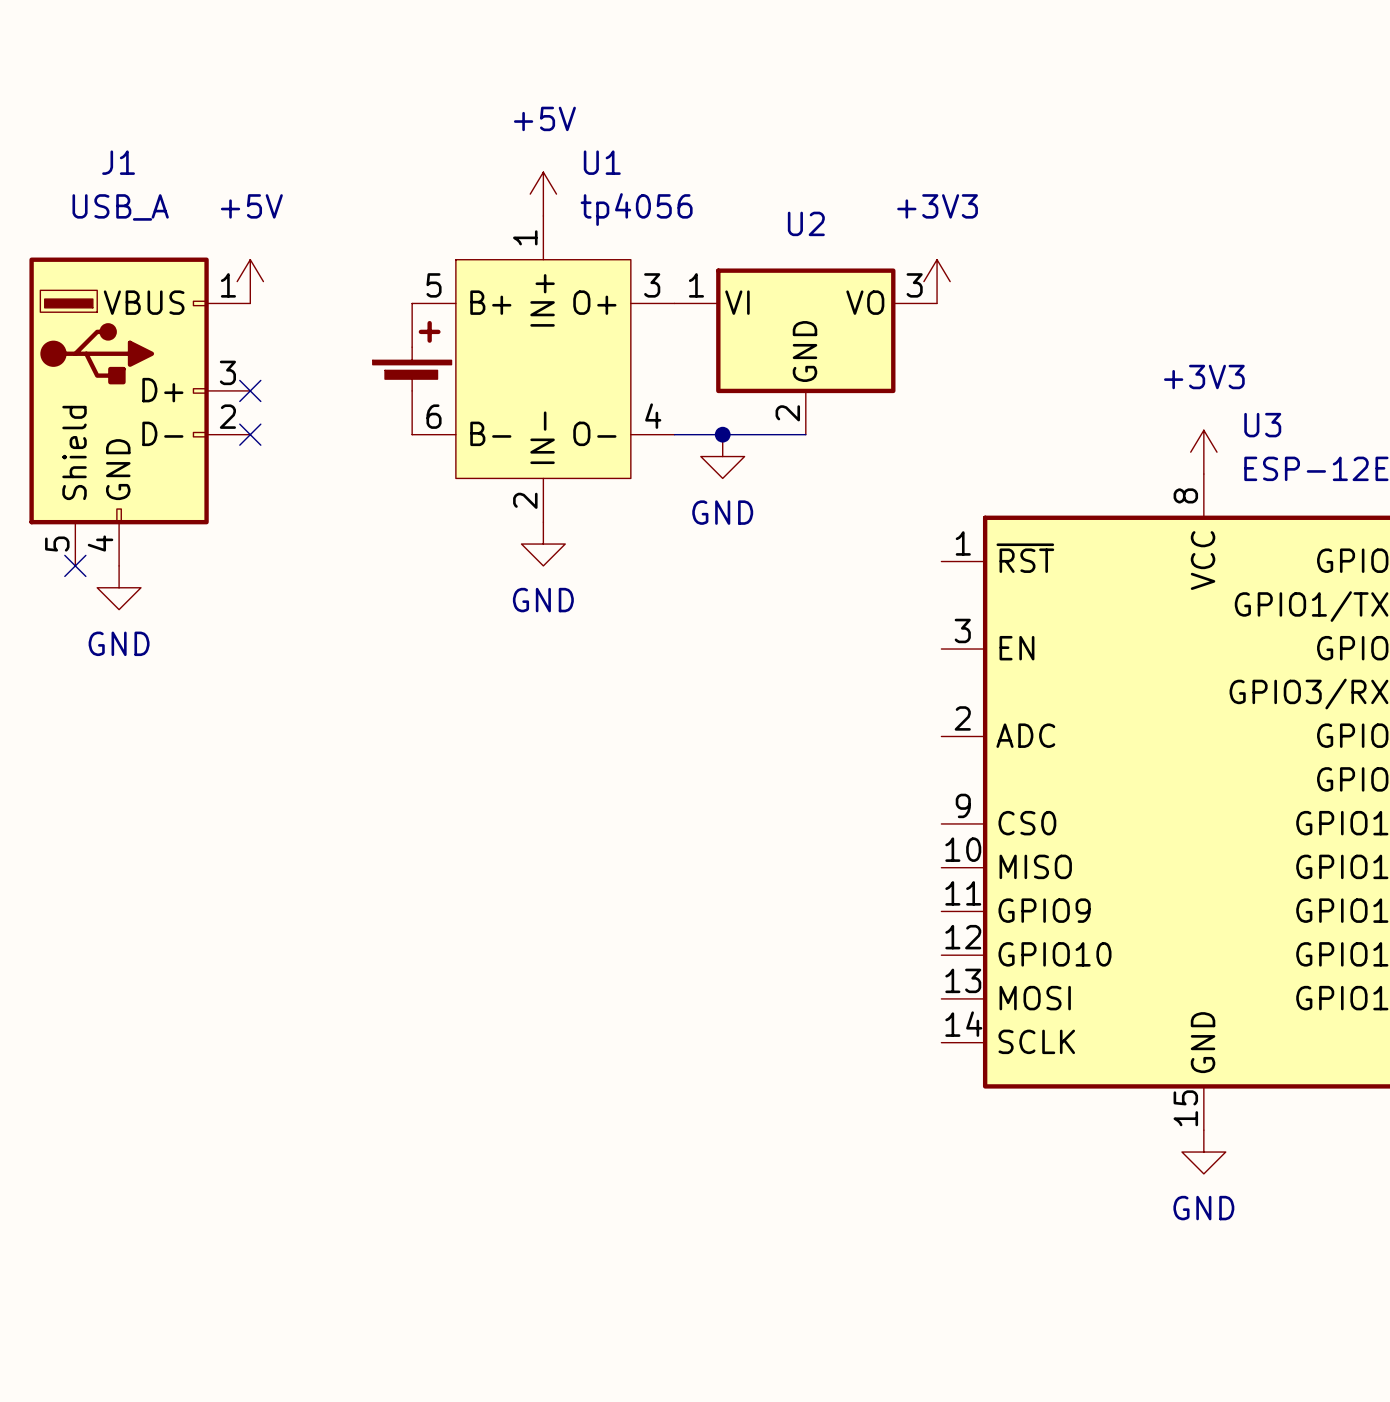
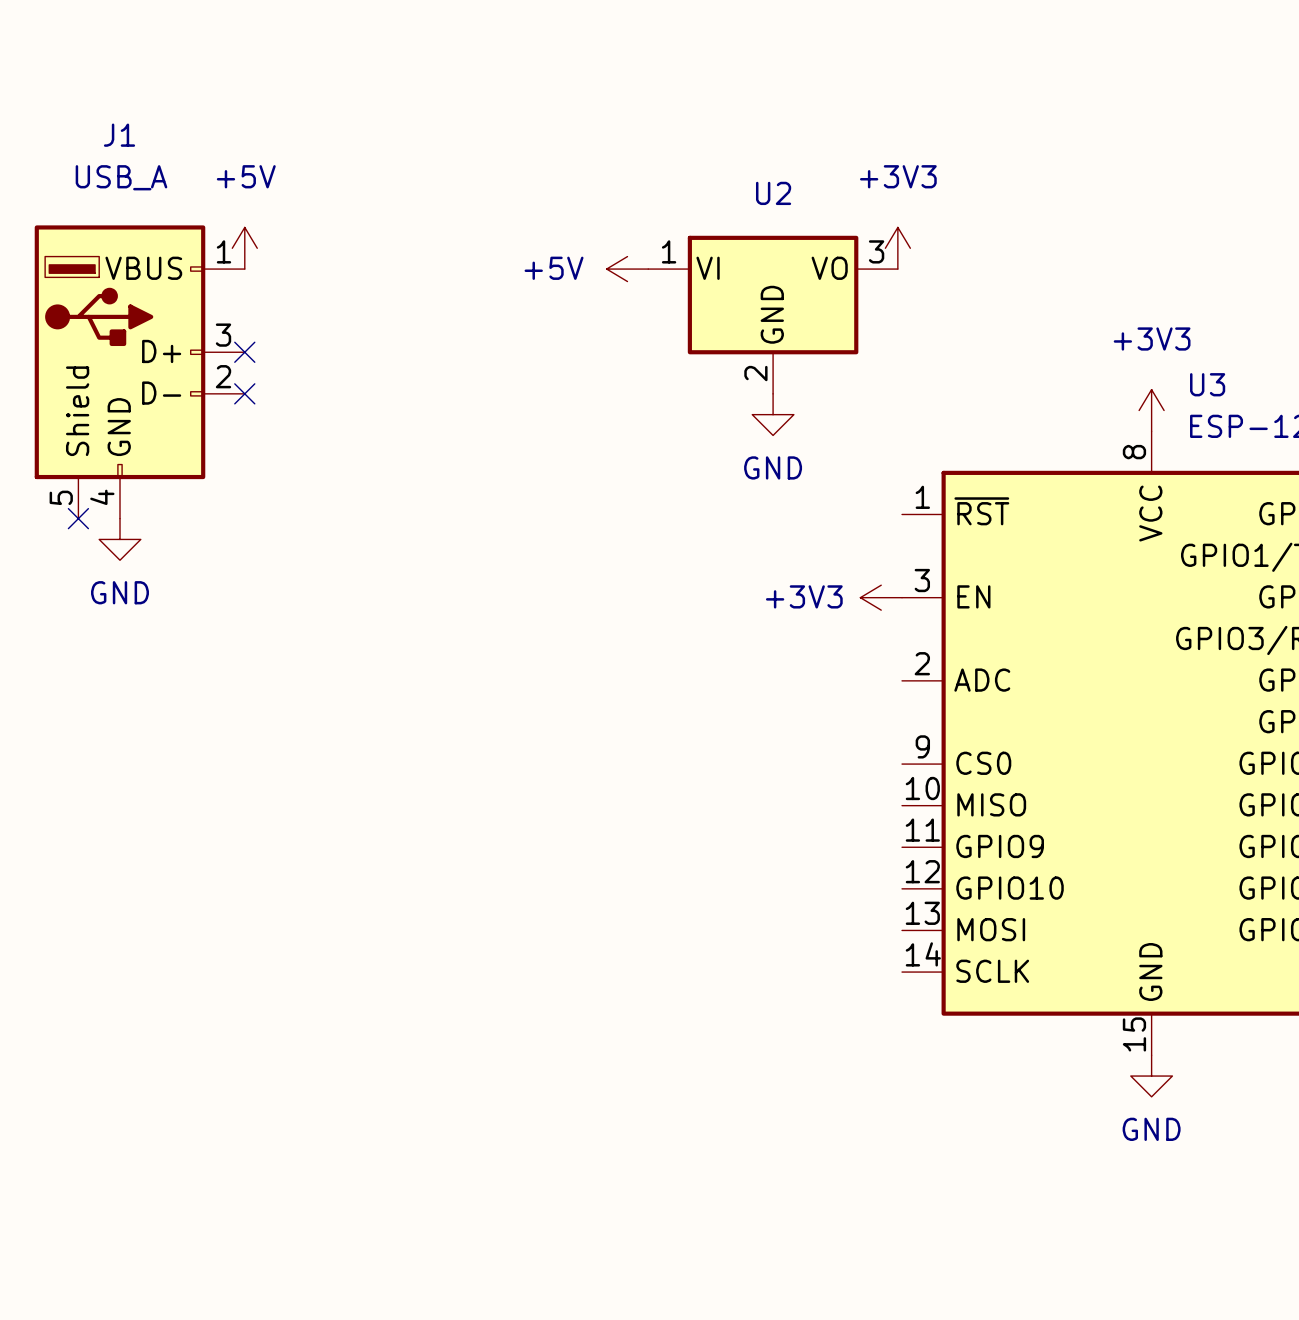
power symbol rotation: 0° (543, 194) -> 90° counterclockwise (627, 269)
power symbol position: +5V (543, 194) -> +5V (627, 269)
part: (412, 369) -> none
U1: tp4056 (543, 369) -> none
wire: (674, 434) (805, 434) -> none
junction: (722, 434) -> none
power symbol position: GND (722, 456) -> GND (773, 414)
power symbol: GND (543, 544) -> none
power symbol: none -> +3V3 (881, 597)

